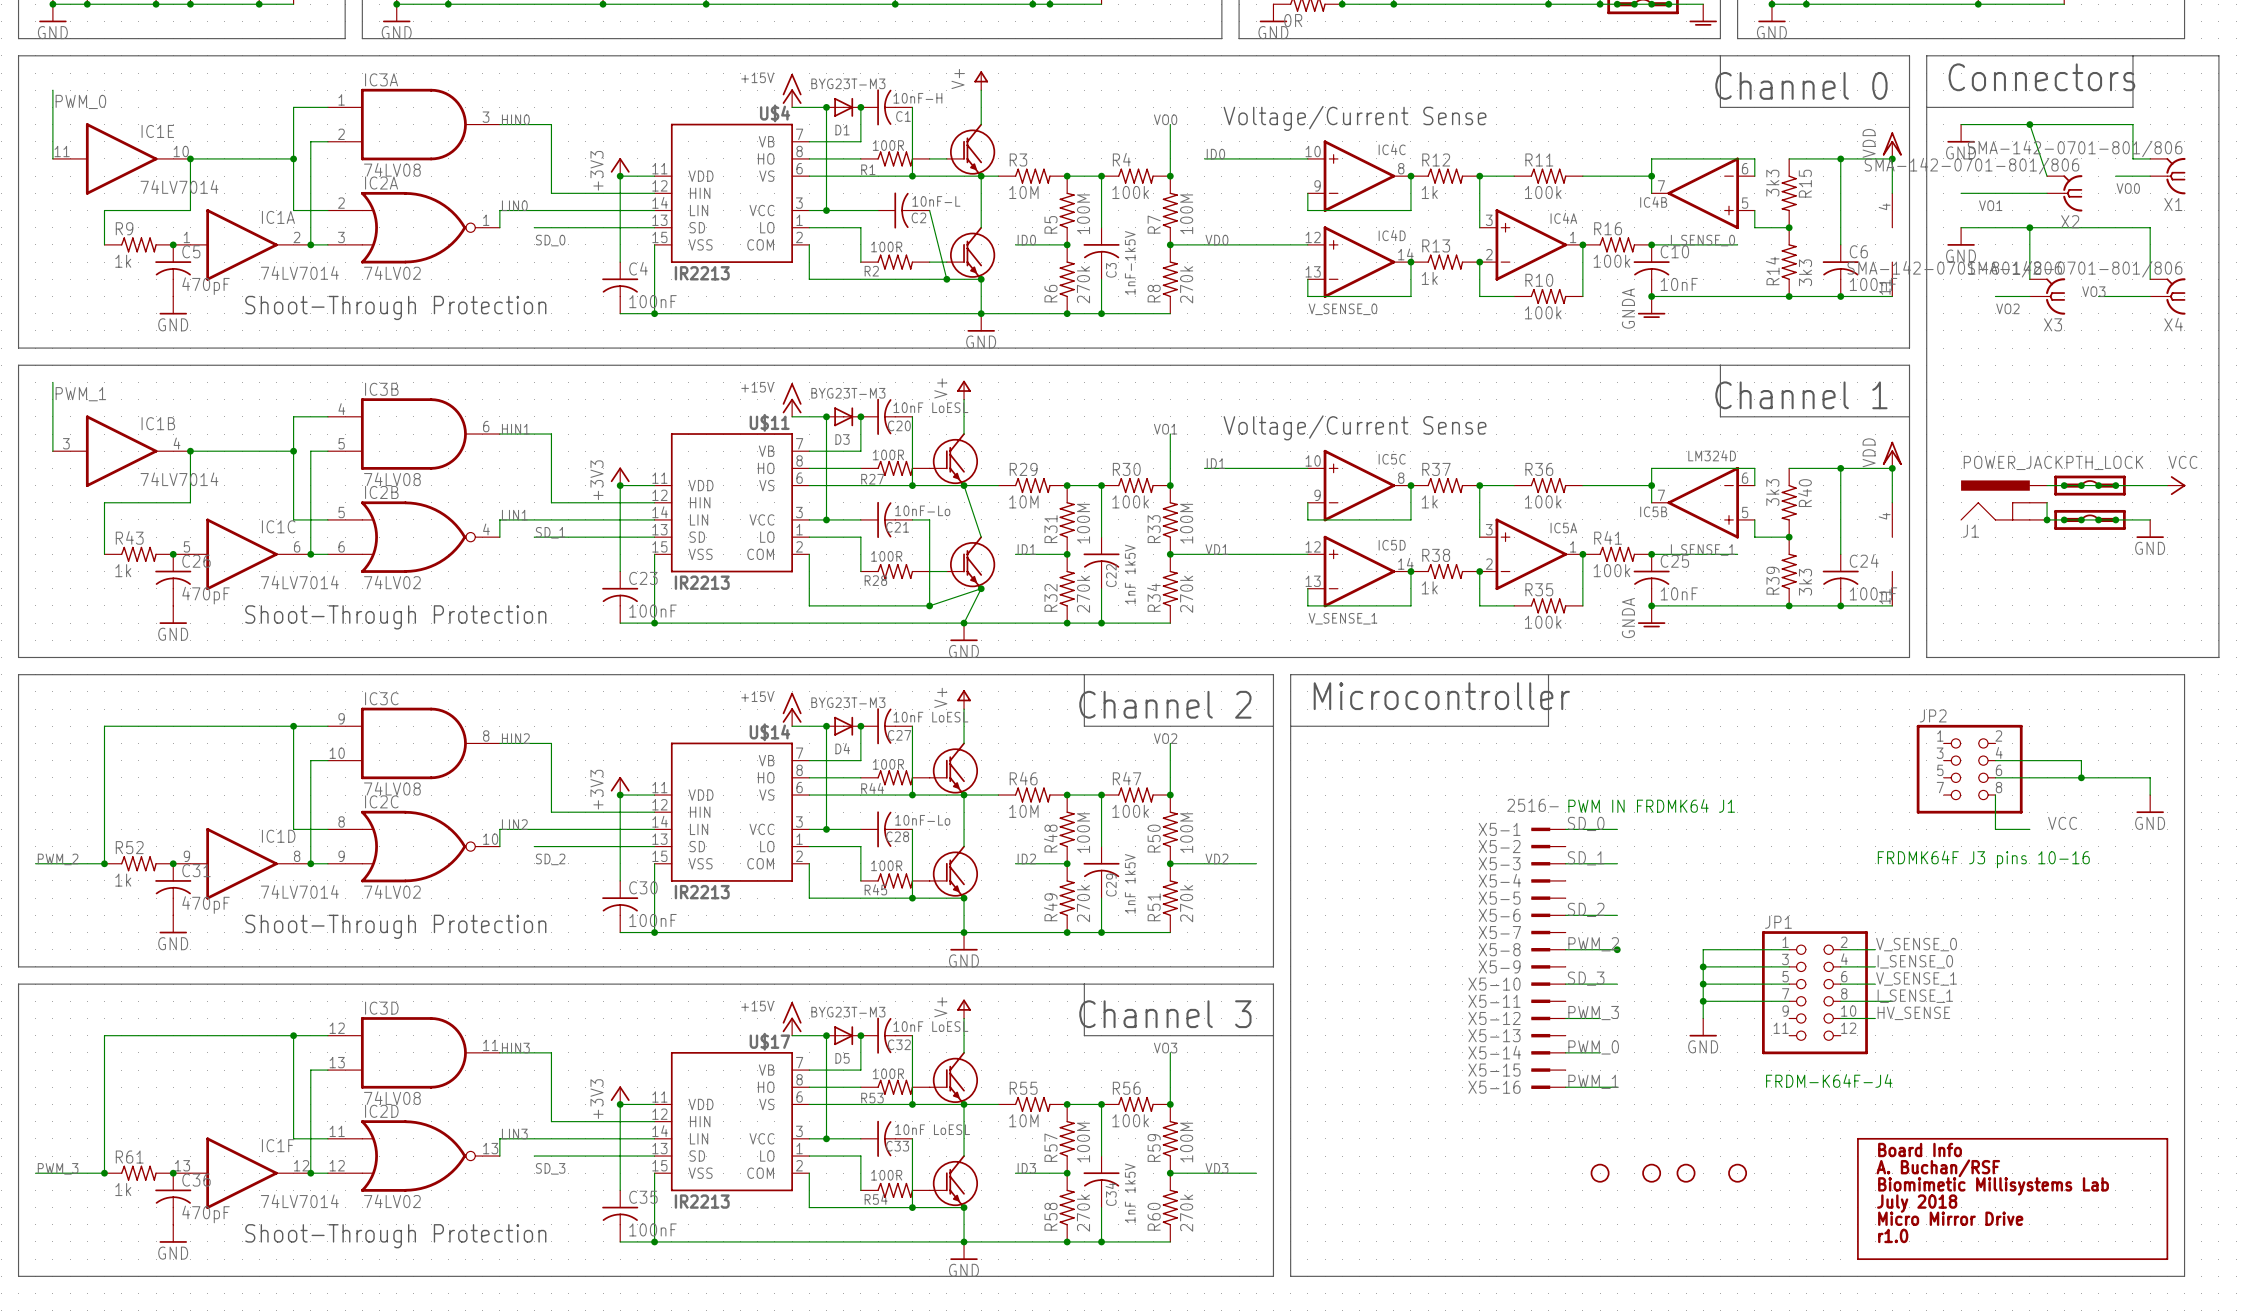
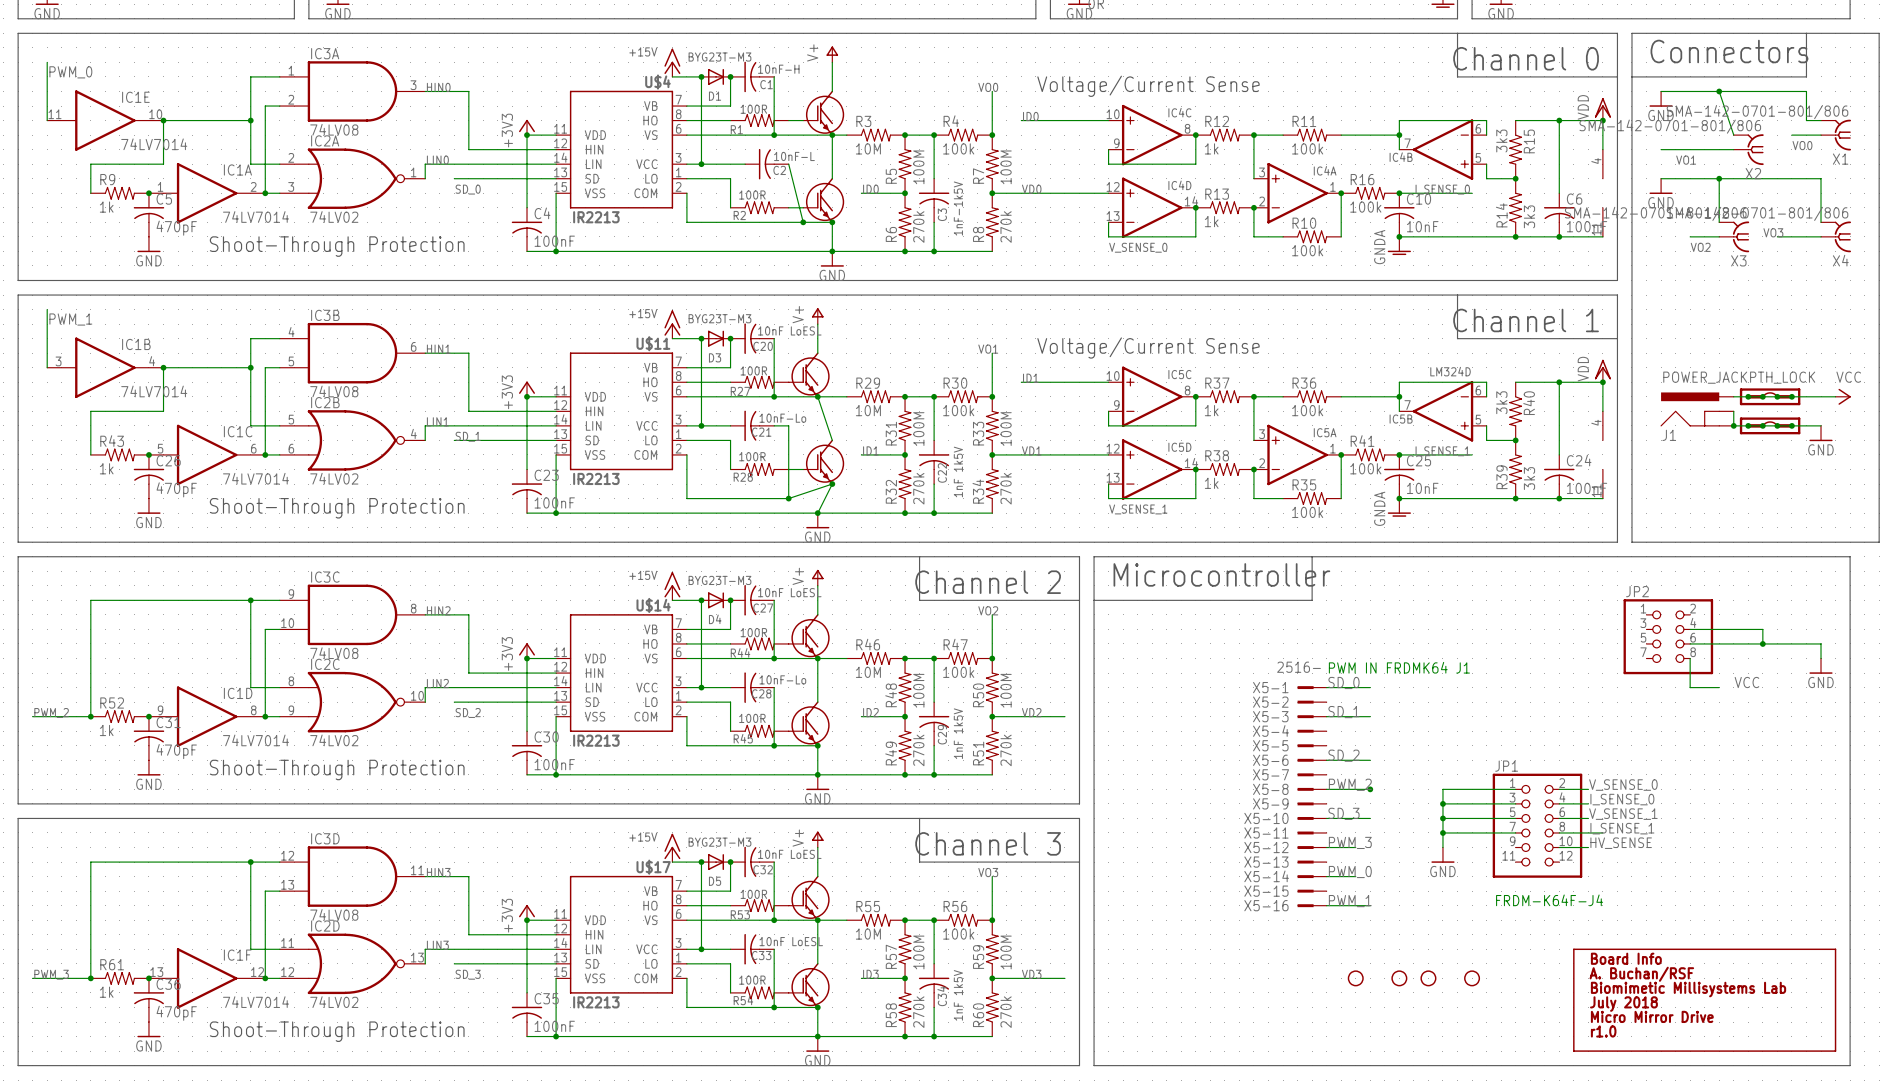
text: FRDMK64F J3 pins 10-16 (1983, 859) -> none

